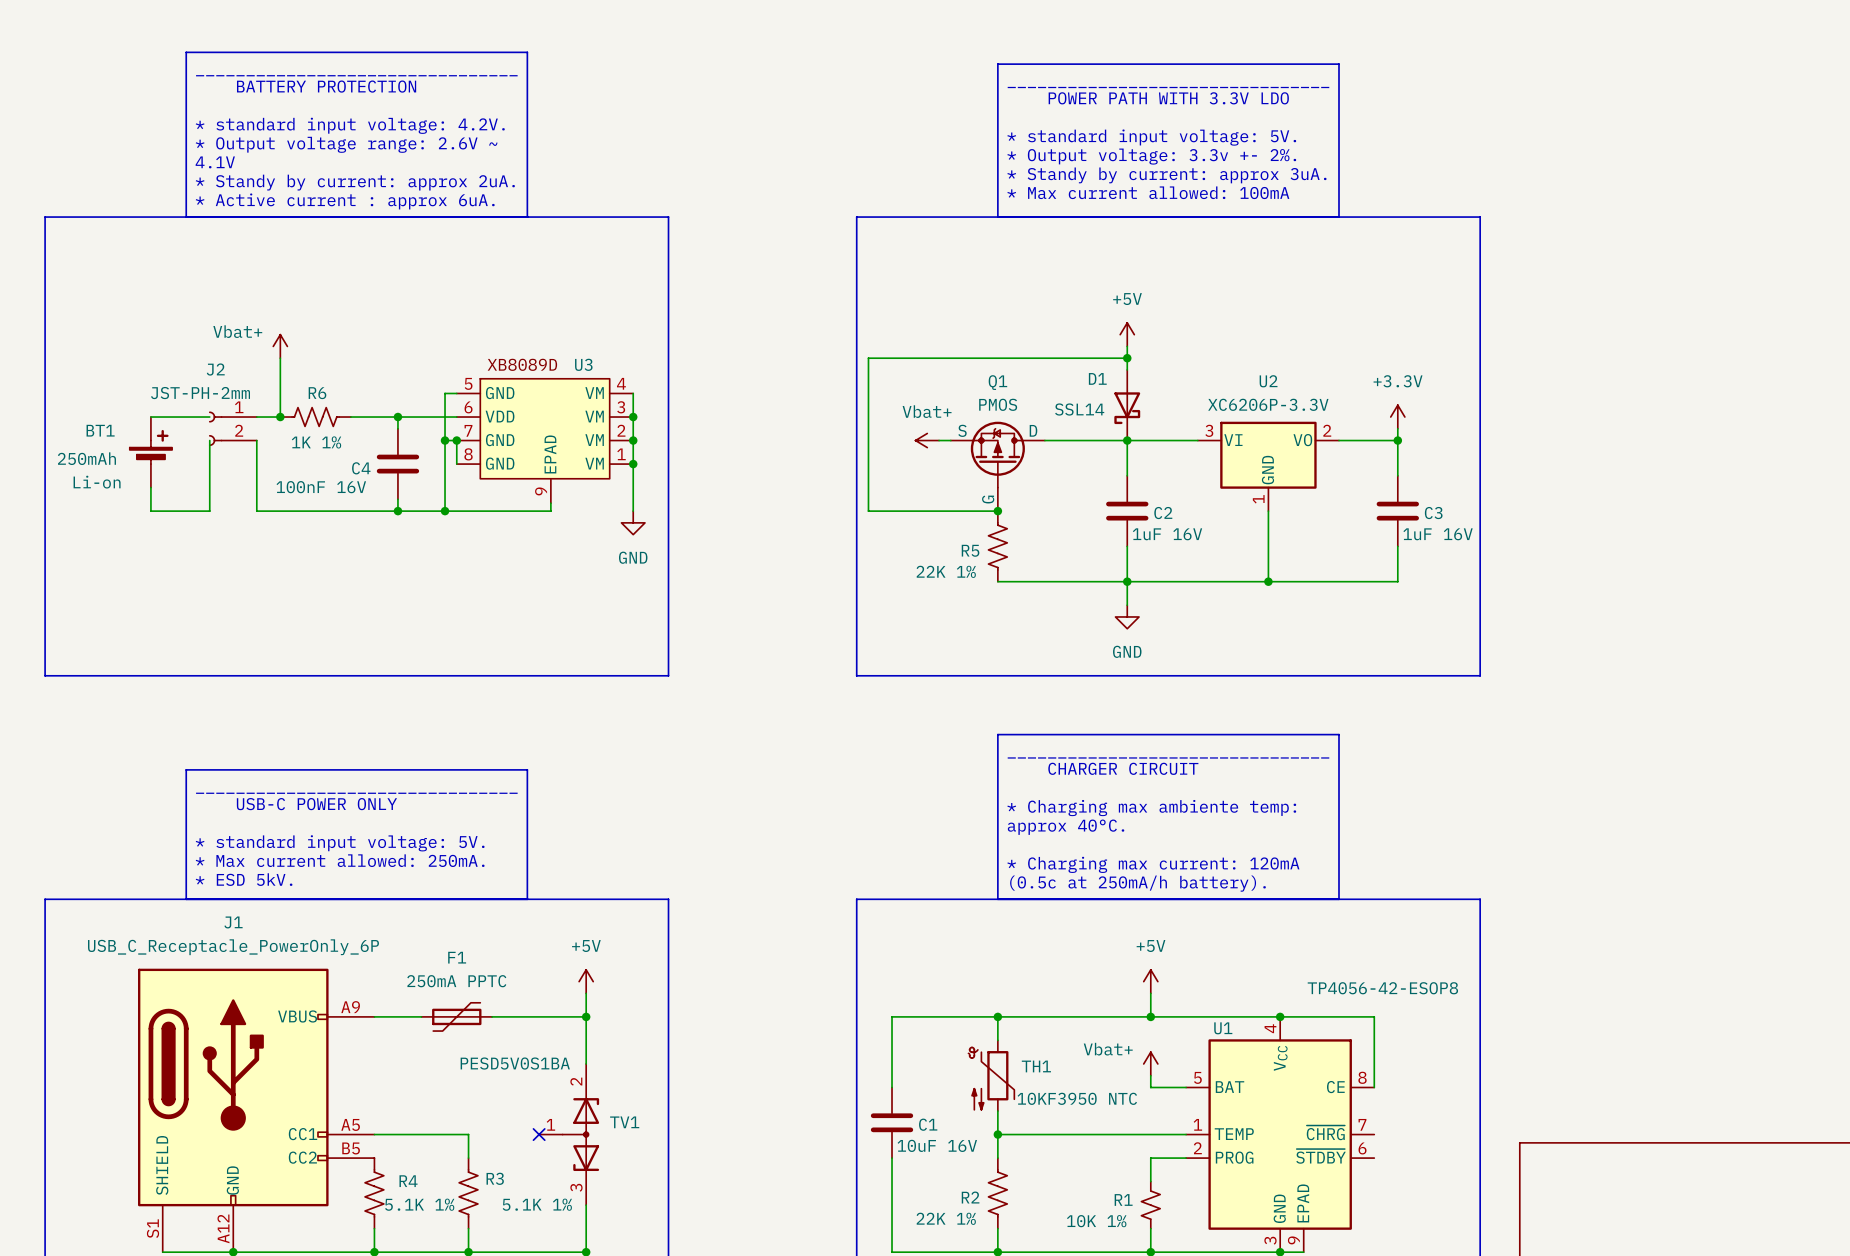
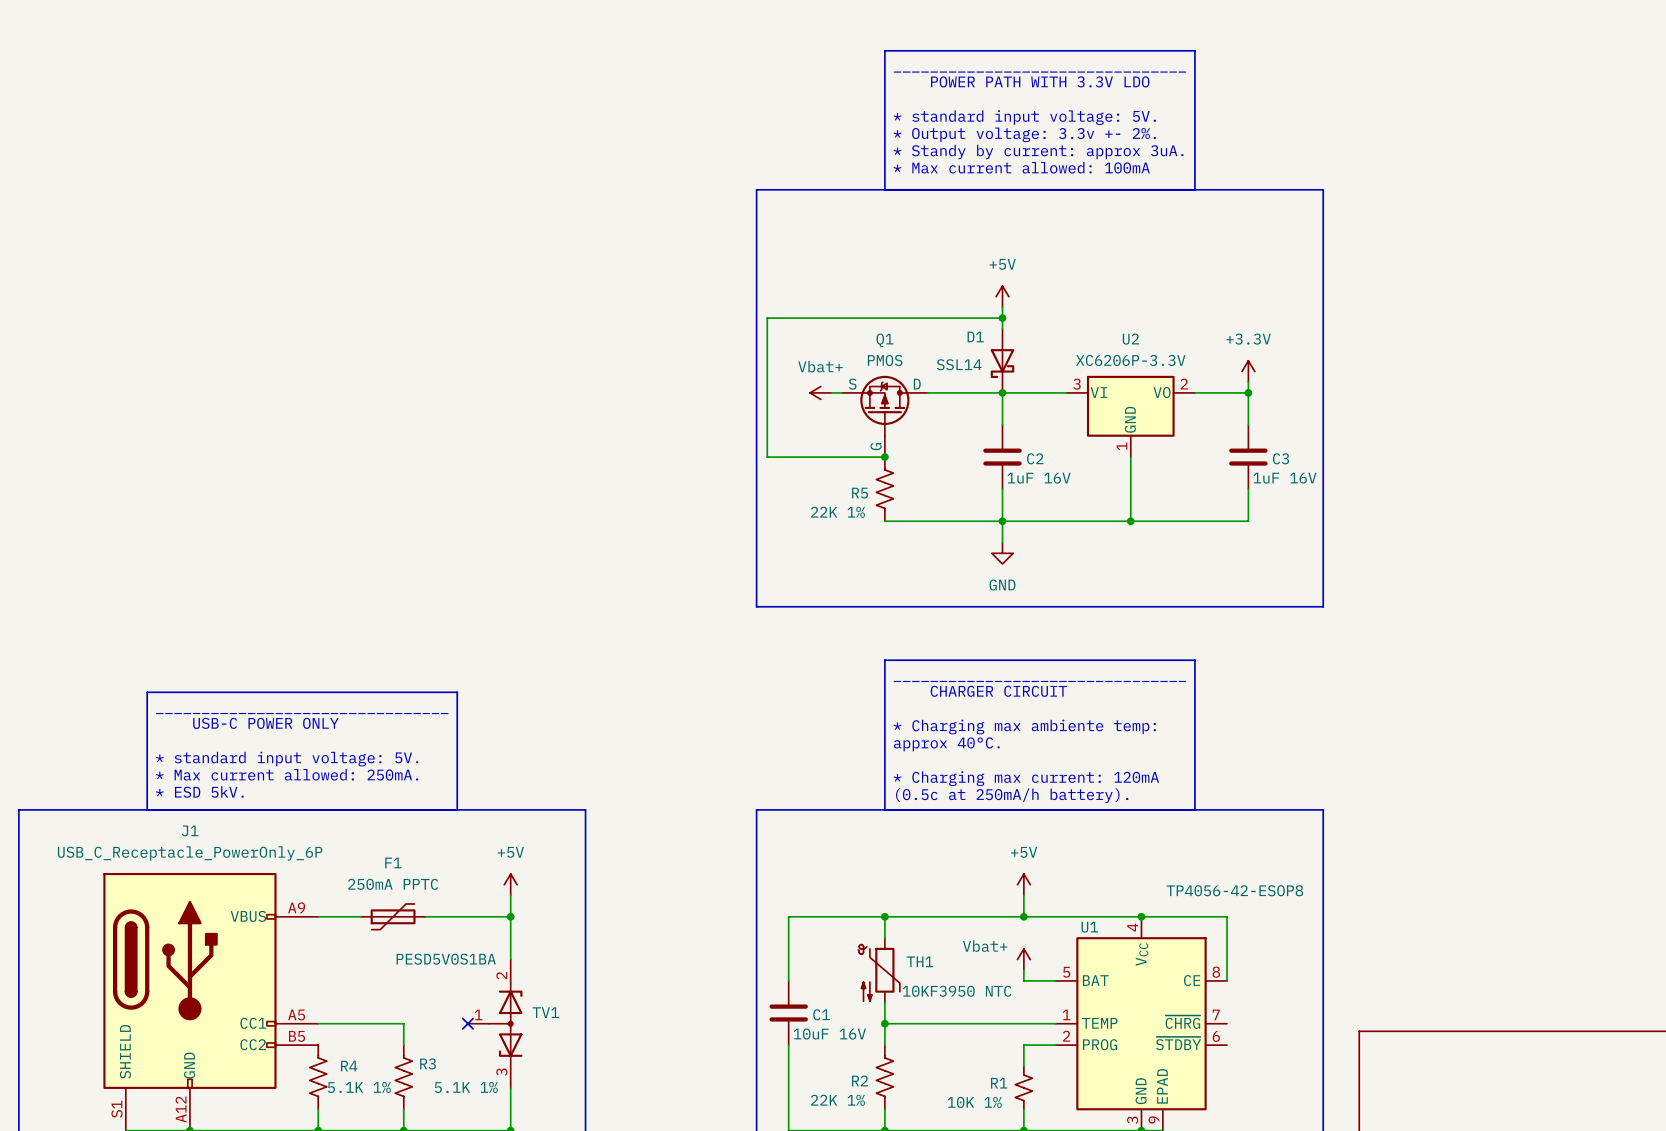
text: ________________________________ (356, 75) -> none
text: BATTERY PROTECTION (326, 86) -> none
text: * standard input voltage: 4.2V. (350, 125) -> none
text: * Output voltage range: 2.6V ~ (346, 144) -> none
text: 4.1V (215, 162) -> none
text: * Standy by current: approx 2uA. (355, 182) -> none
text: * Active current : approx 6uA. (345, 201) -> none
line: (45, 217) (668, 217) (668, 675) (45, 675) (45, 217) -> none
line: (186, 217) (186, 52) (527, 52) (527, 217) -> none
power symbol: Vbat+ (280, 346) -> none
wire: (280, 358) (280, 417) (256, 417) -> none
wire: (456, 393) (445, 393) (445, 511) -> none
wire: (633, 393) (633, 511) -> none
wire: (150, 417) (209, 417) -> none
junction: (280, 417) -> none
R6: 1K 1% (315, 417) -> none
wire: (350, 417) (456, 417) -> none
wire: (397, 417) (397, 428) -> none
junction: (397, 417) -> none
junction: (633, 417) -> none
J2: JST-PH-2mm (232, 428) -> none
wire: (209, 440) (209, 511) (150, 511) (150, 487) -> none
wire: (256, 440) (256, 511) (550, 511) (550, 503) -> none
wire: (445, 440) (456, 440) (456, 464) -> none
junction: (445, 440) -> none
junction: (456, 440) -> none
U3: (545, 440) -> none
junction: (633, 440) -> none
BT1: 250mAh (150, 452) -> none
C4: 100nF 16V (397, 464) -> none
junction: (633, 464) -> none
wire: (397, 499) (397, 511) -> none
junction: (397, 511) -> none
junction: (445, 511) -> none
power symbol: GND (633, 522) -> none

